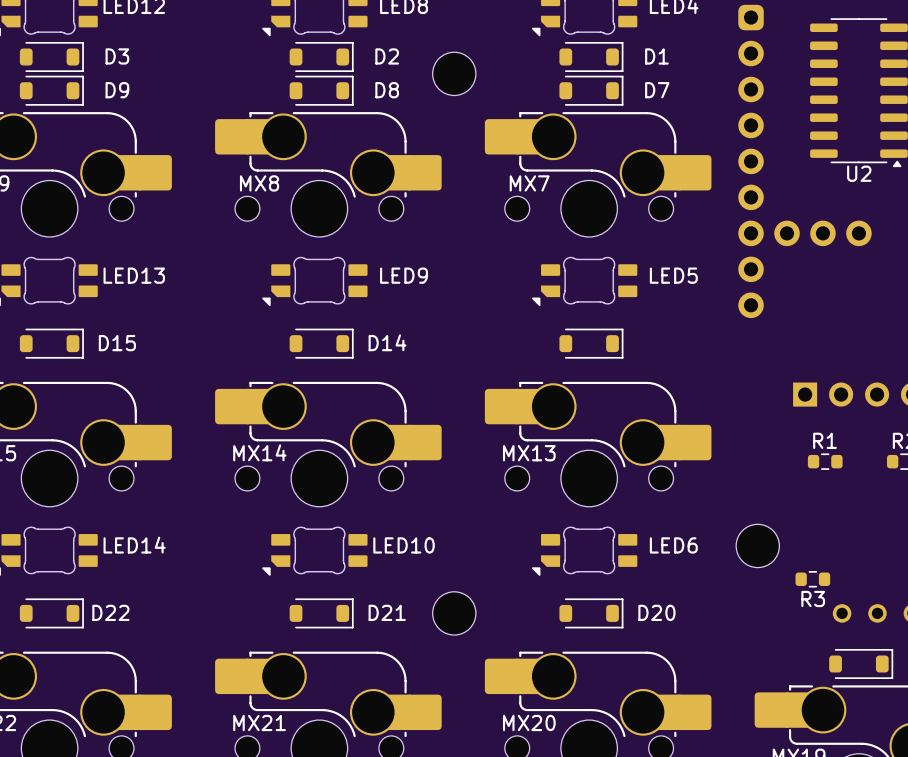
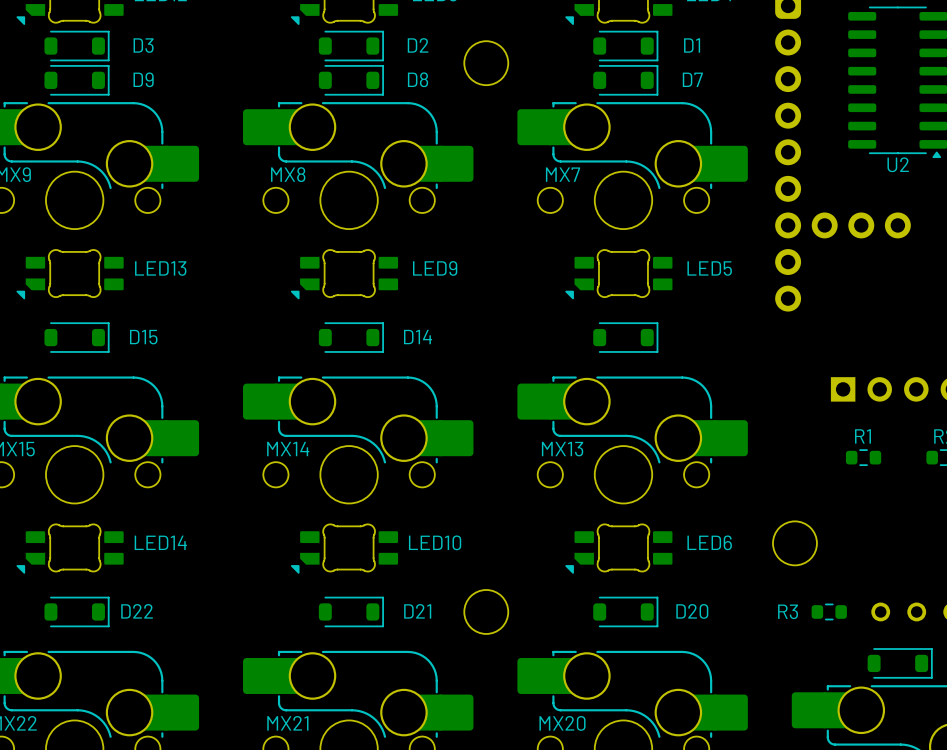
R3 position: (812, 579) -> (829, 611)
R3 name position: R3 (813, 598) -> R3 (788, 611)

